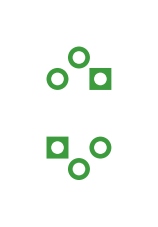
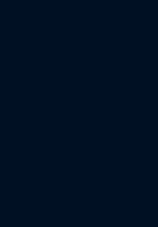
part: (78, 68) -> none
part: (78, 158) -> none

